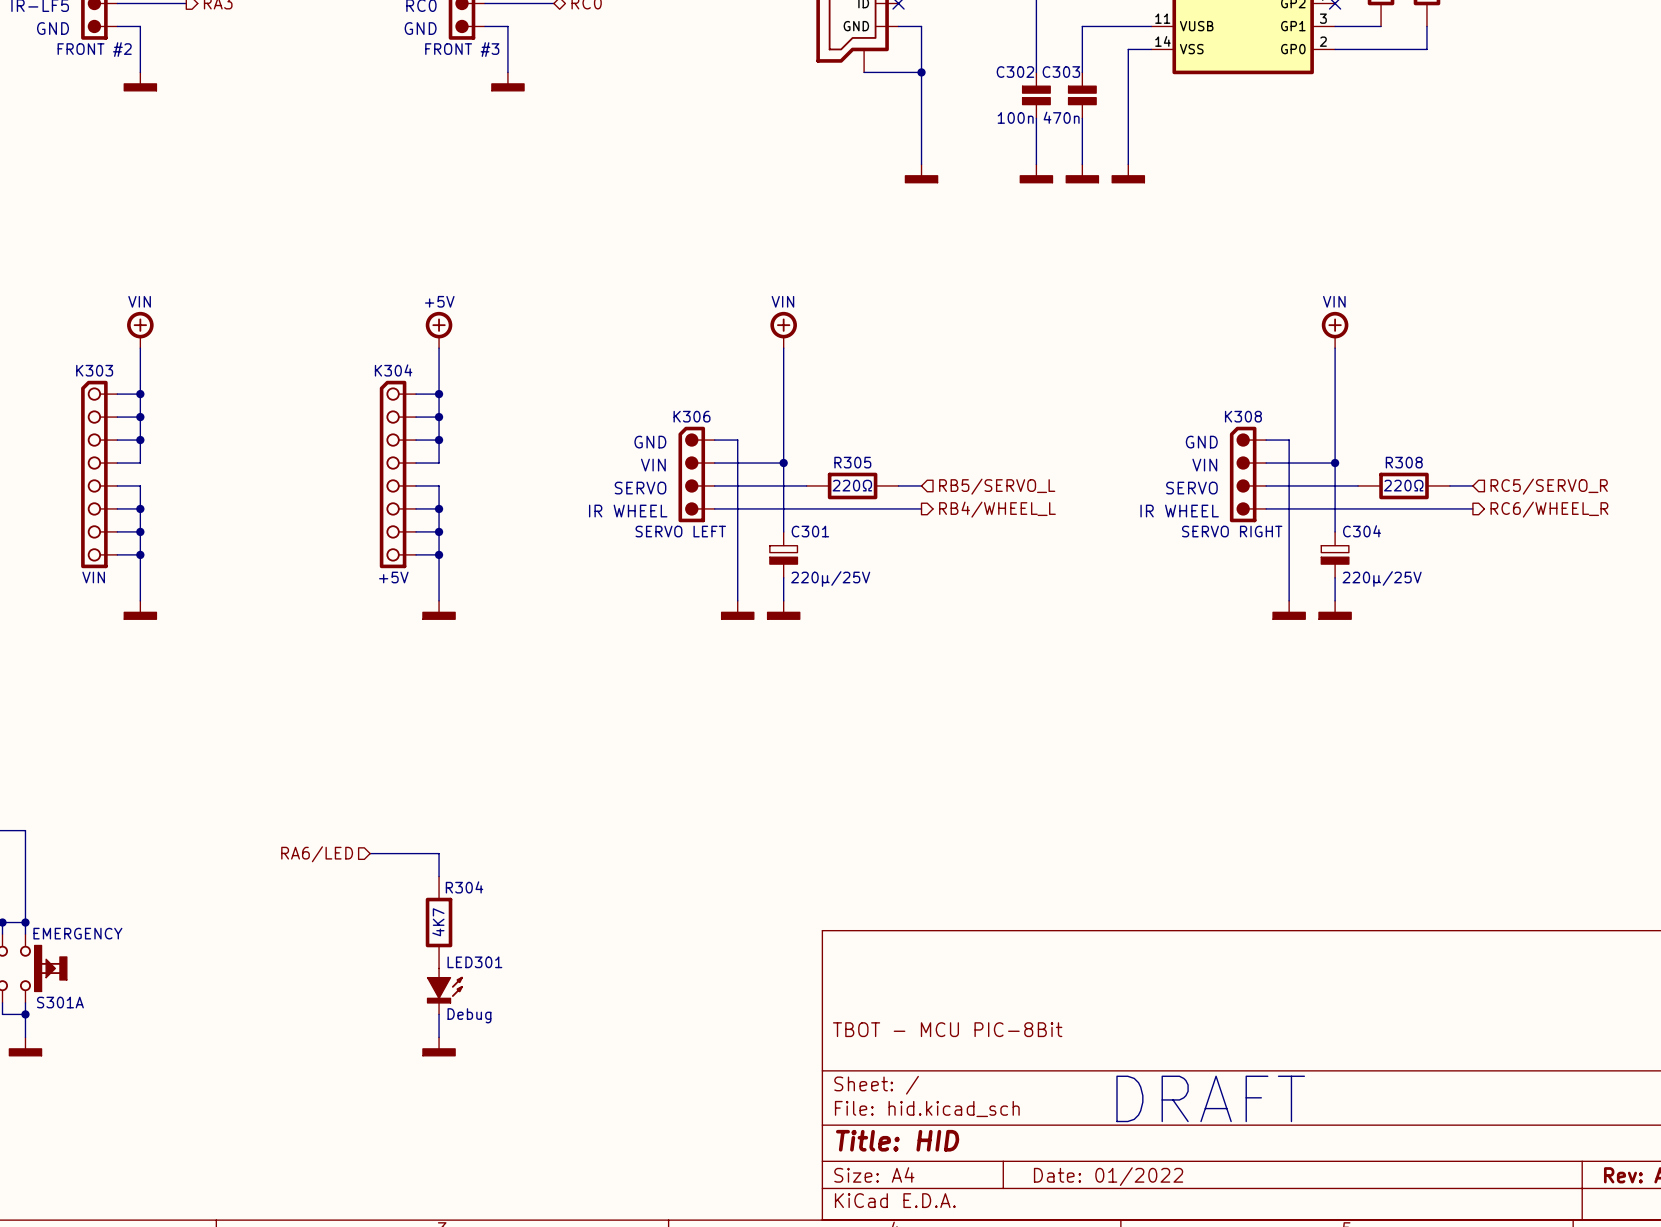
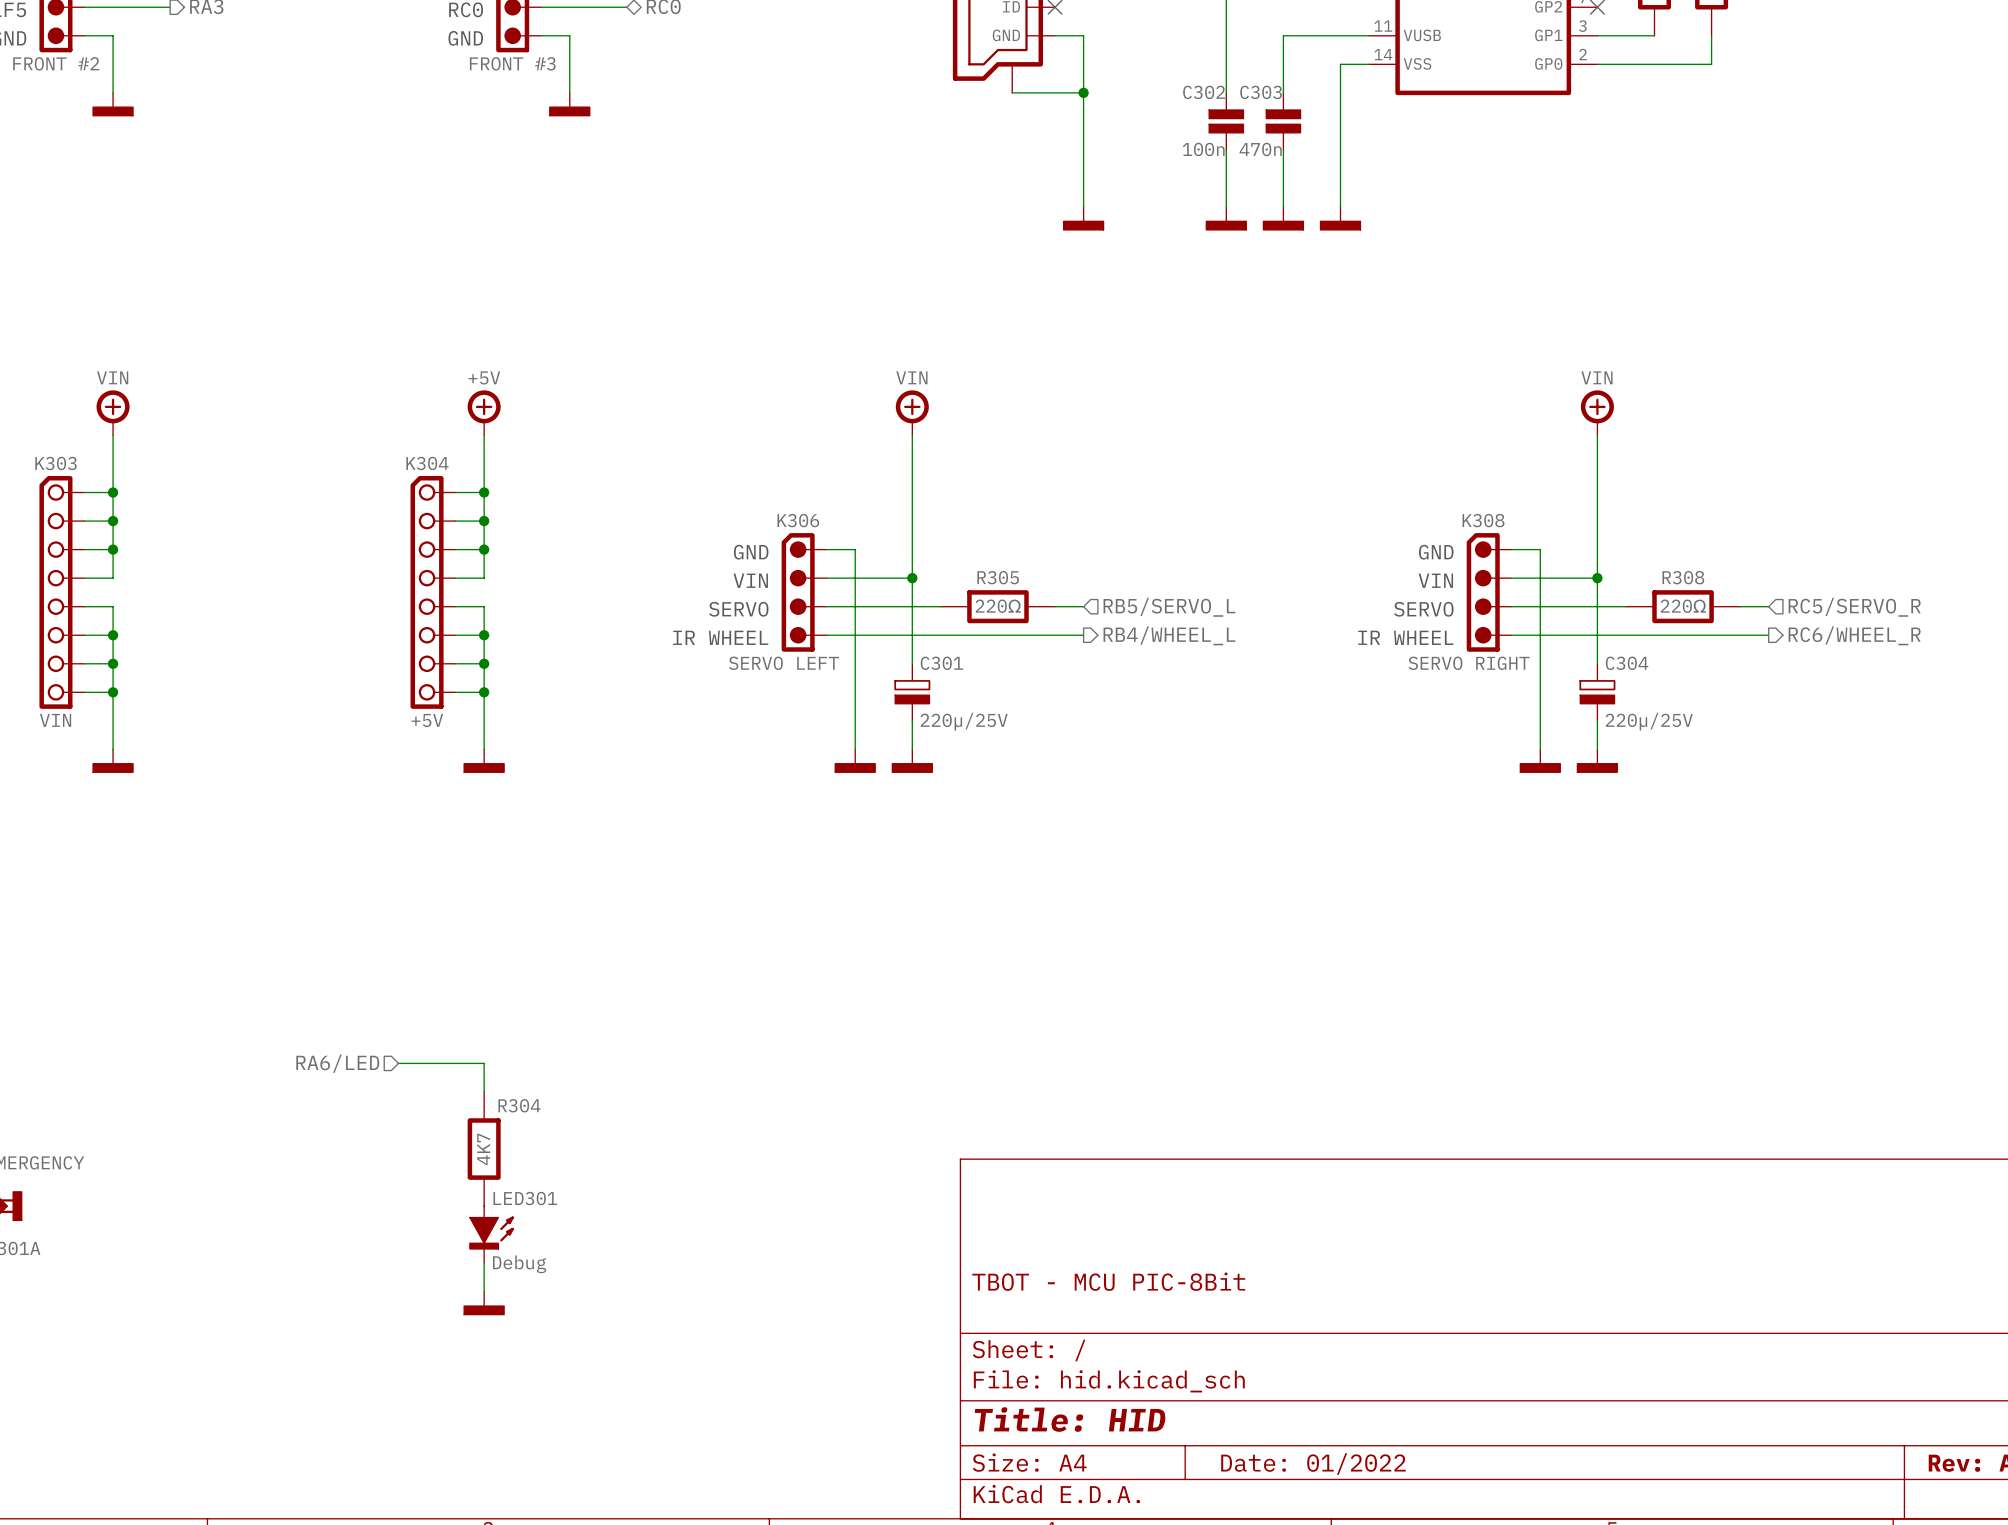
text: DRAFT (1210, 1098) -> none

